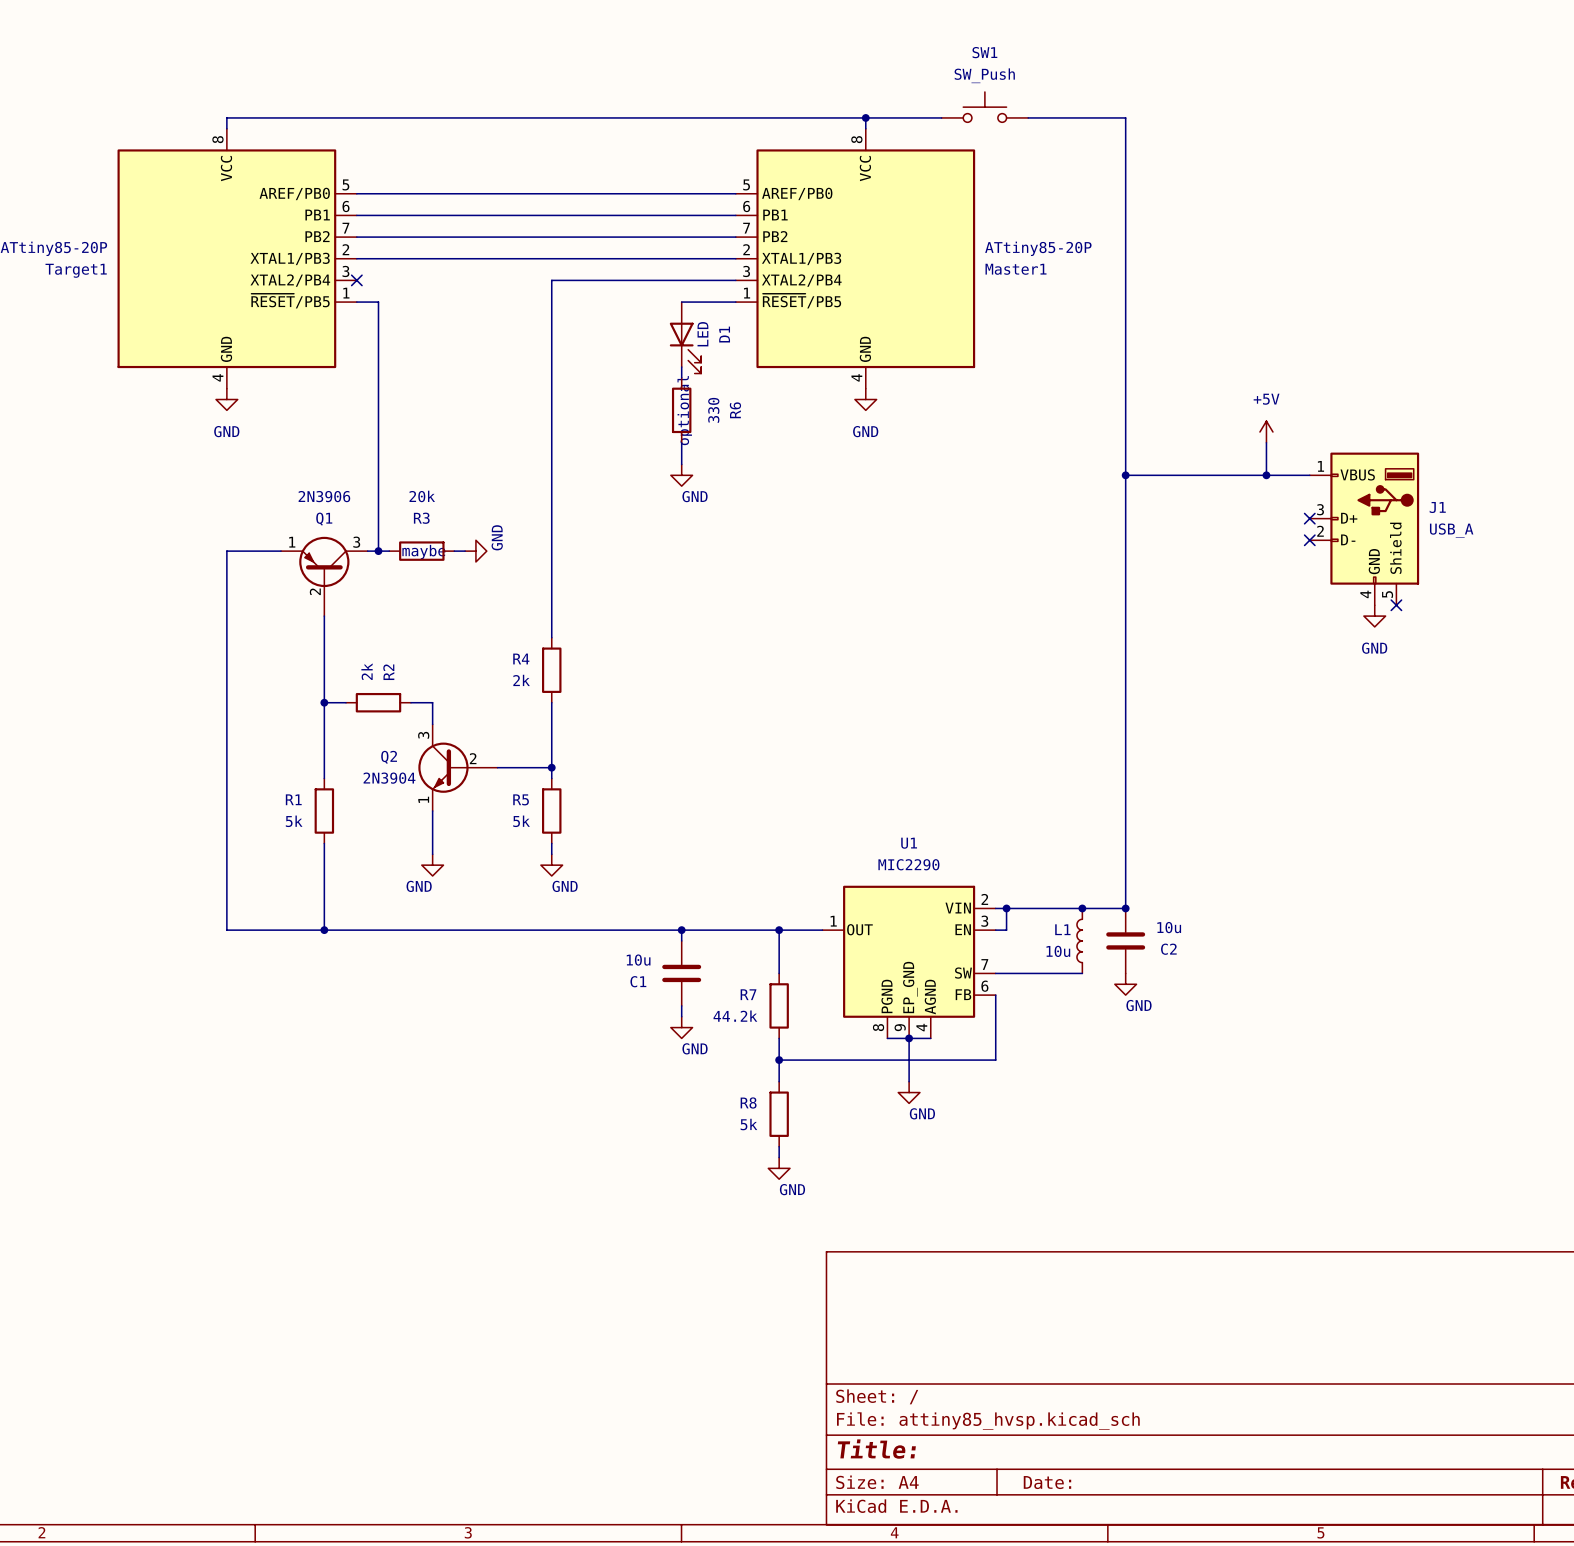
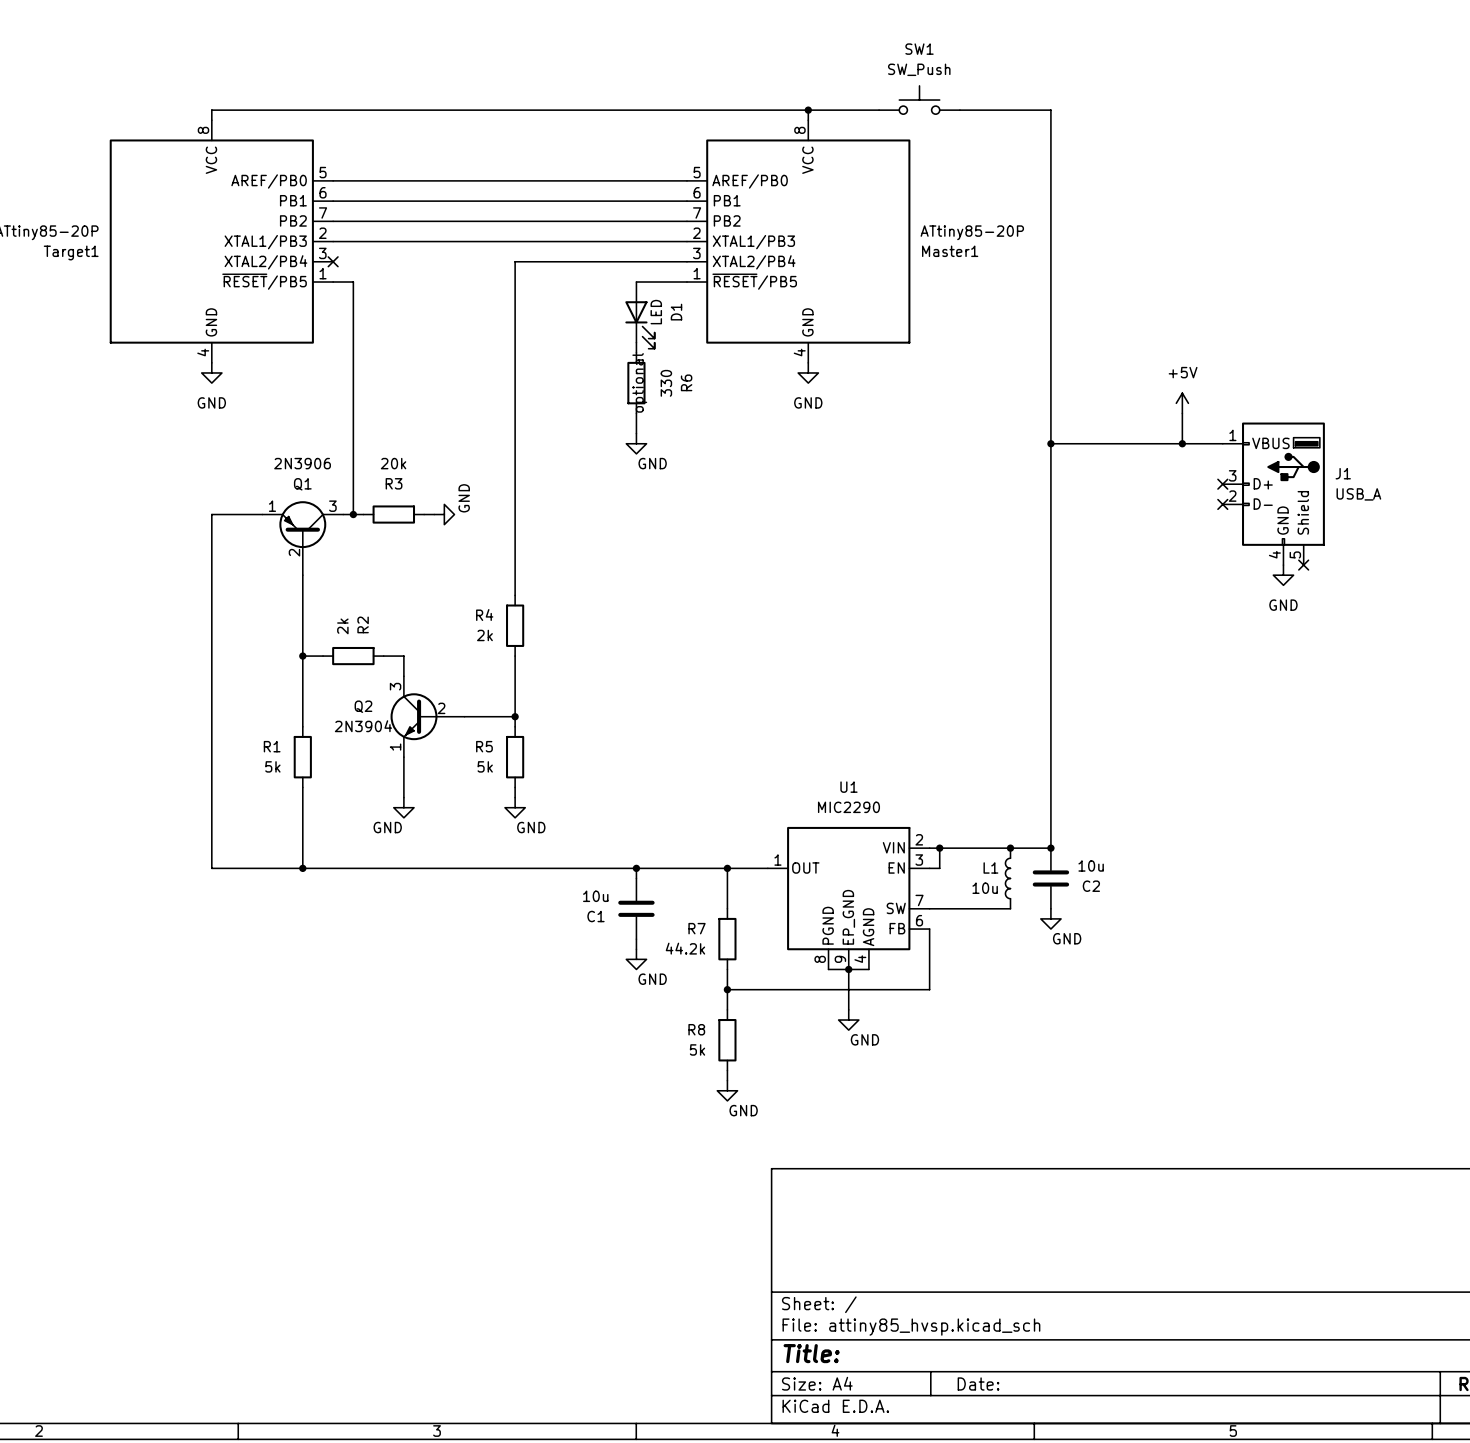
text: maybe (423, 552) -> none

